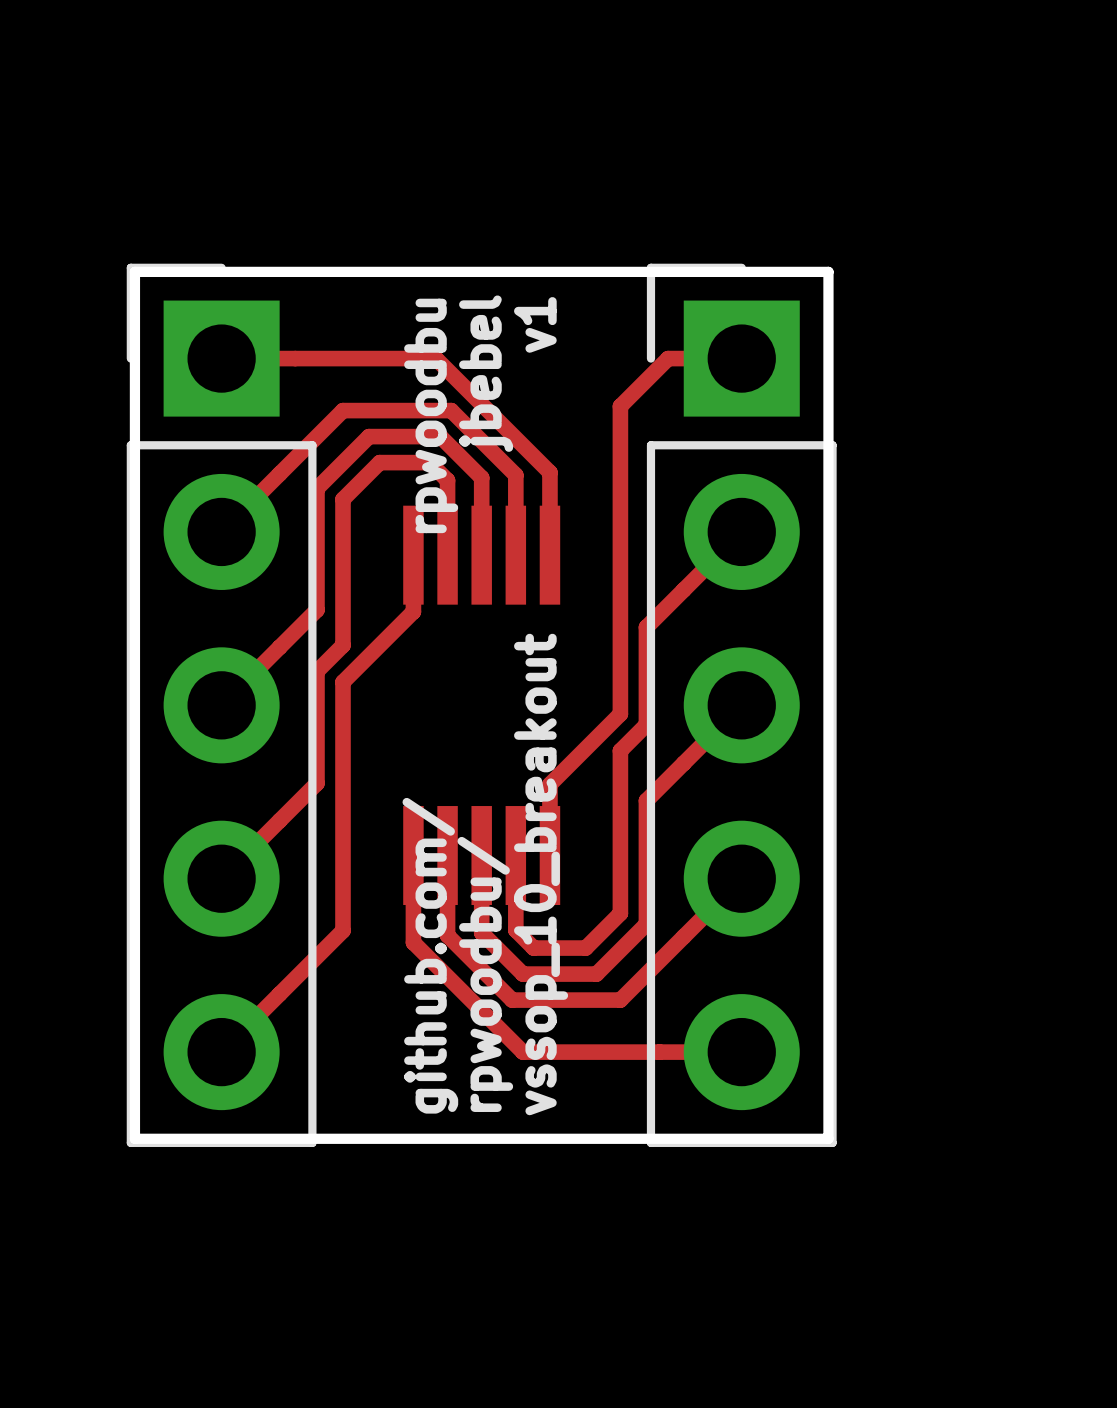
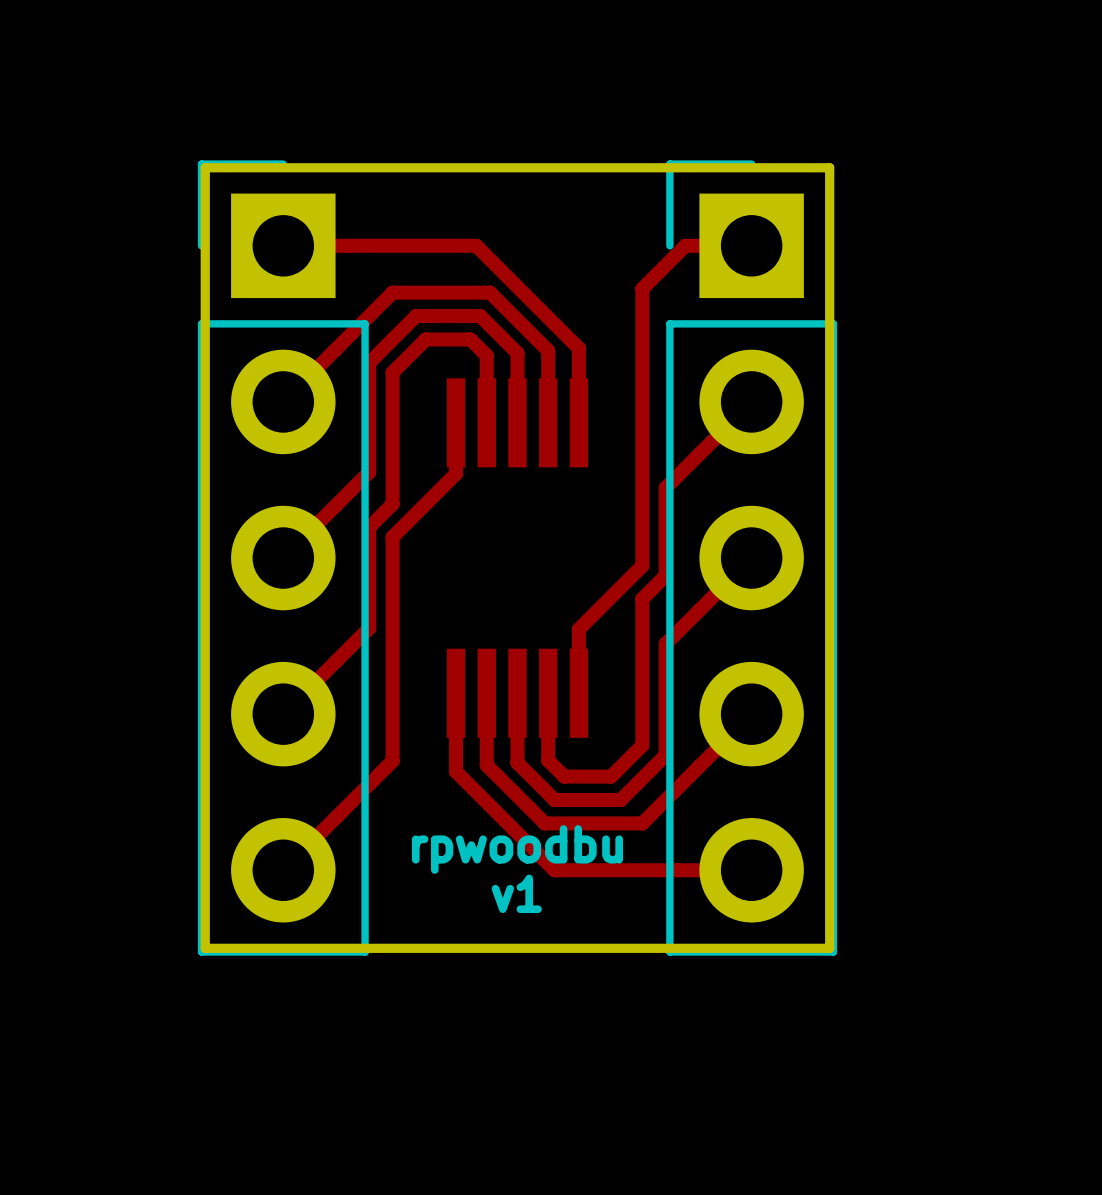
text rotation: 0° (535, 324) -> 90° clockwise (516, 893)
text position: v1 (535, 324) -> v1 (516, 893)
text: jbebel (486, 373) -> none
text rotation: 0° (431, 415) -> 90° clockwise (517, 849)
text position: rpwoodbu (431, 415) -> rpwoodbu (517, 849)
text: vssop_10_breakout (541, 874) -> none
text: github.com/ (430, 955) -> none
text: rpwoodbu/ (485, 974) -> none

